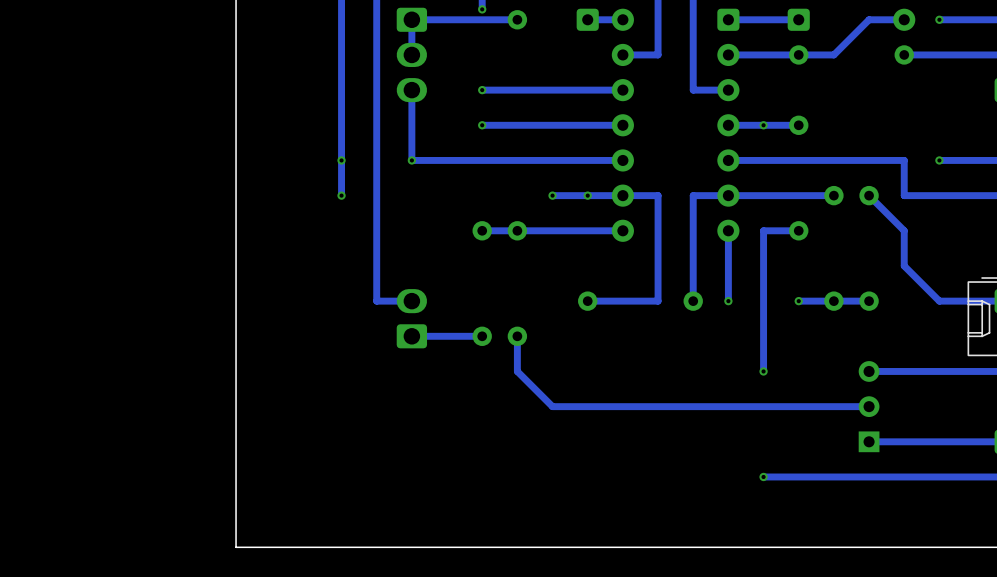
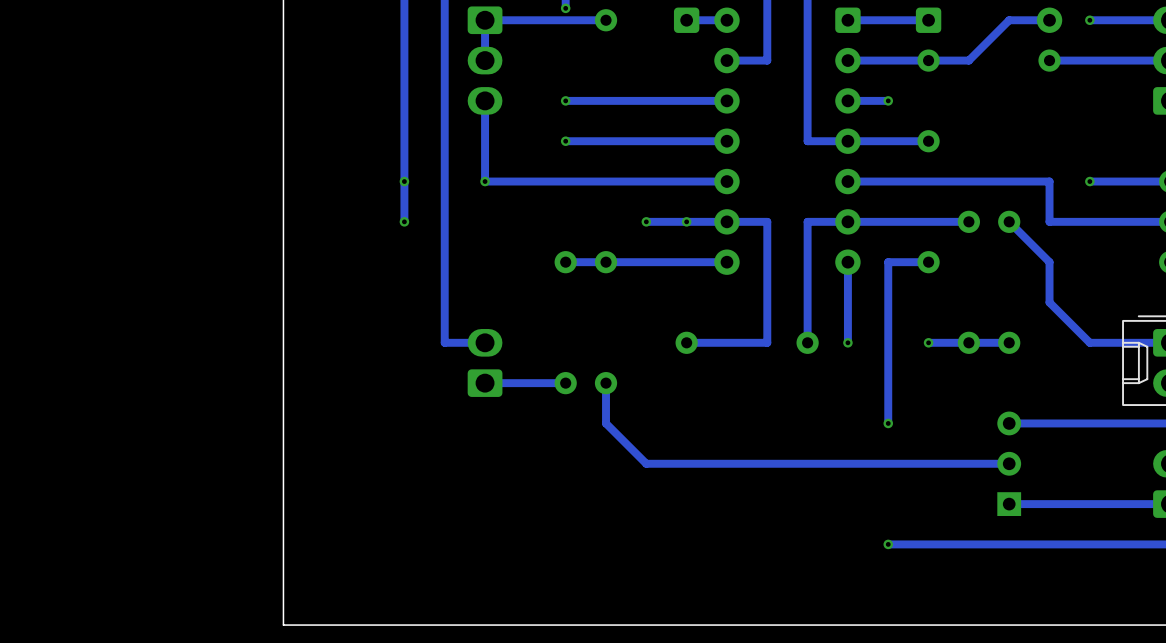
track: (728, 90) (693, 90) -> (847, 141) (807, 141) (807, 100)
track: none -> (888, 100) (847, 100)
via position: (763, 125) -> (888, 100)

